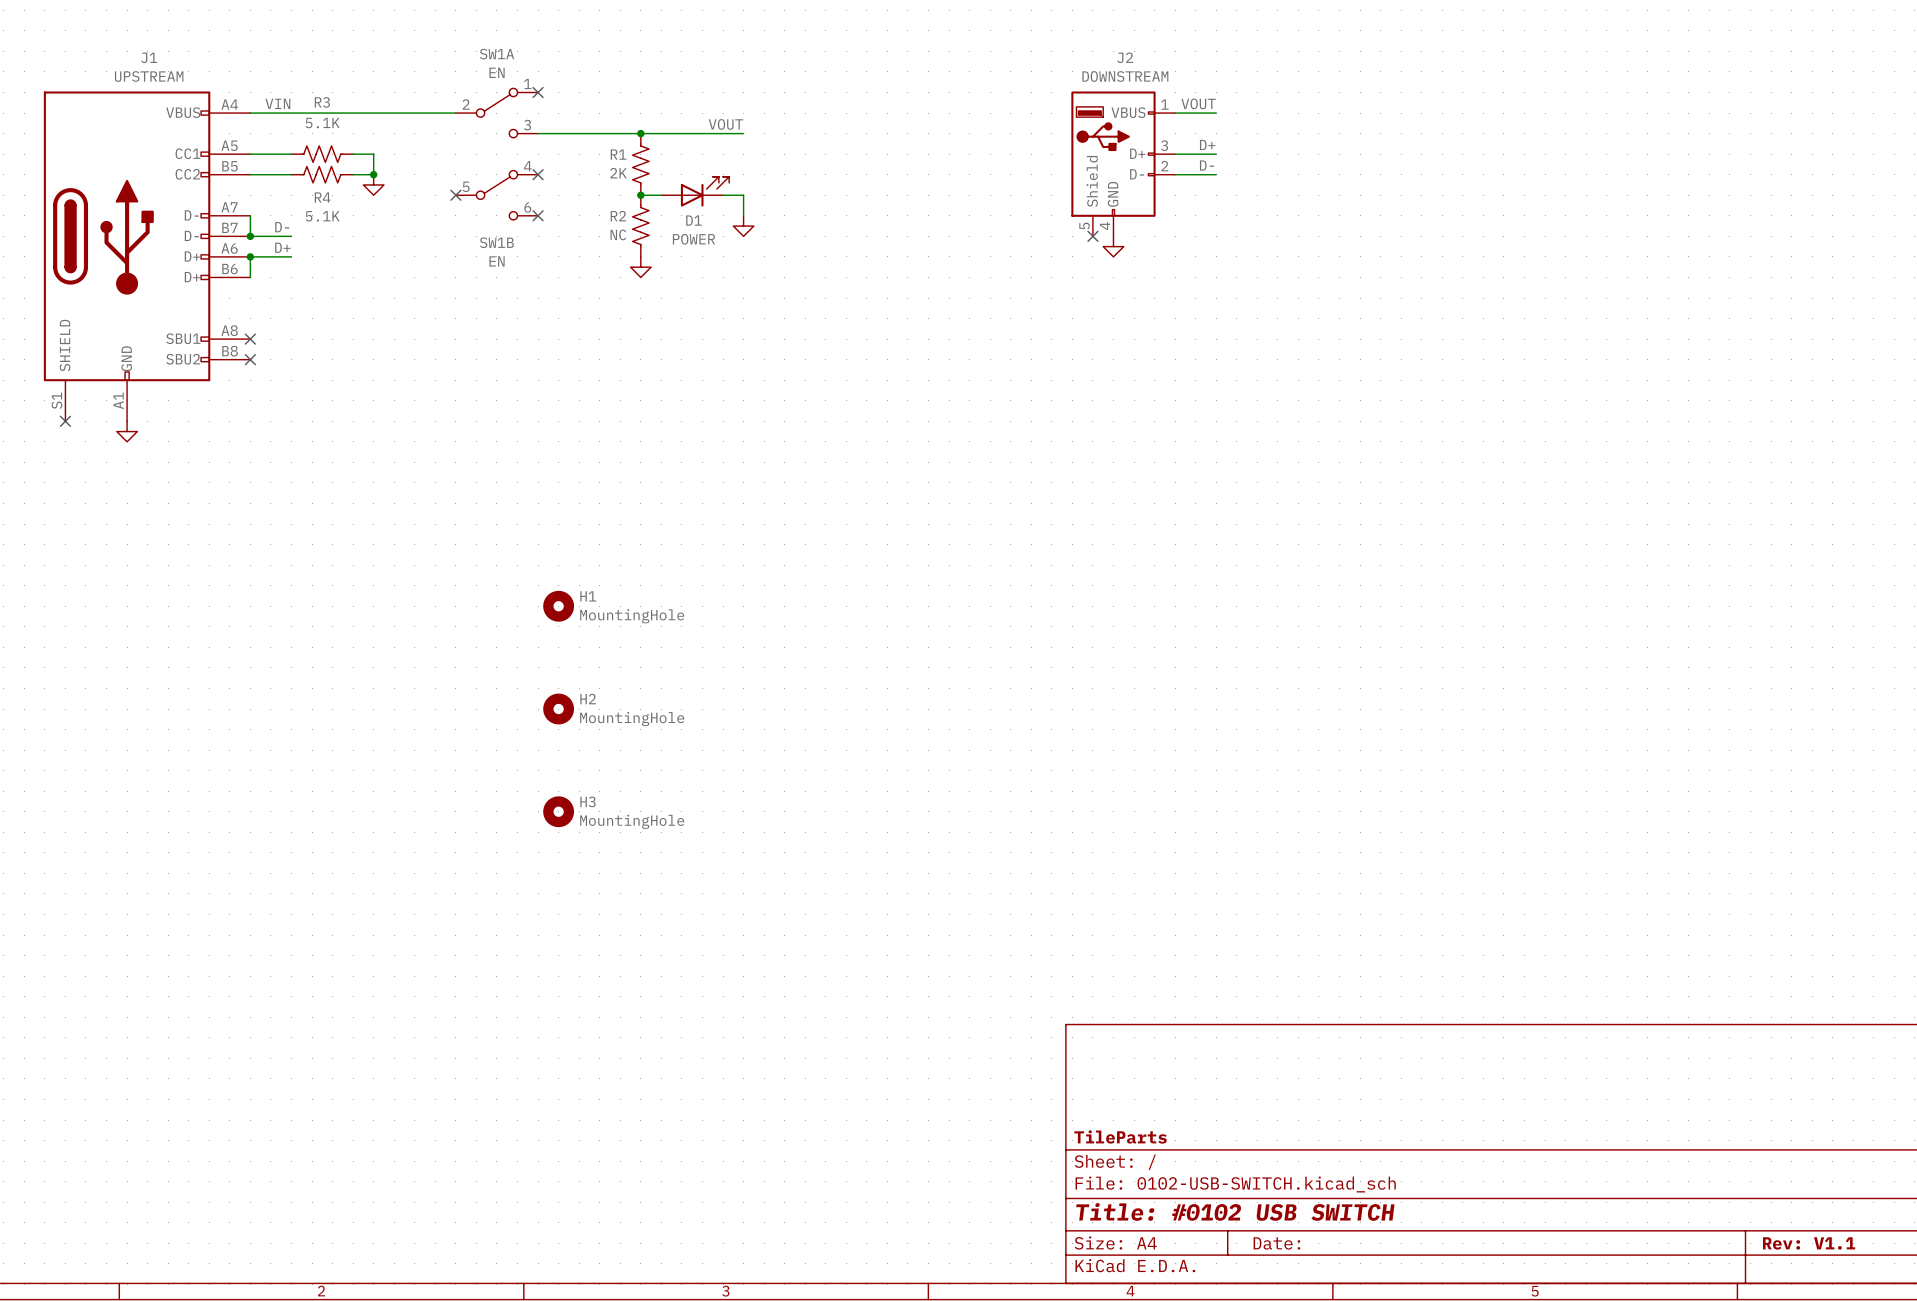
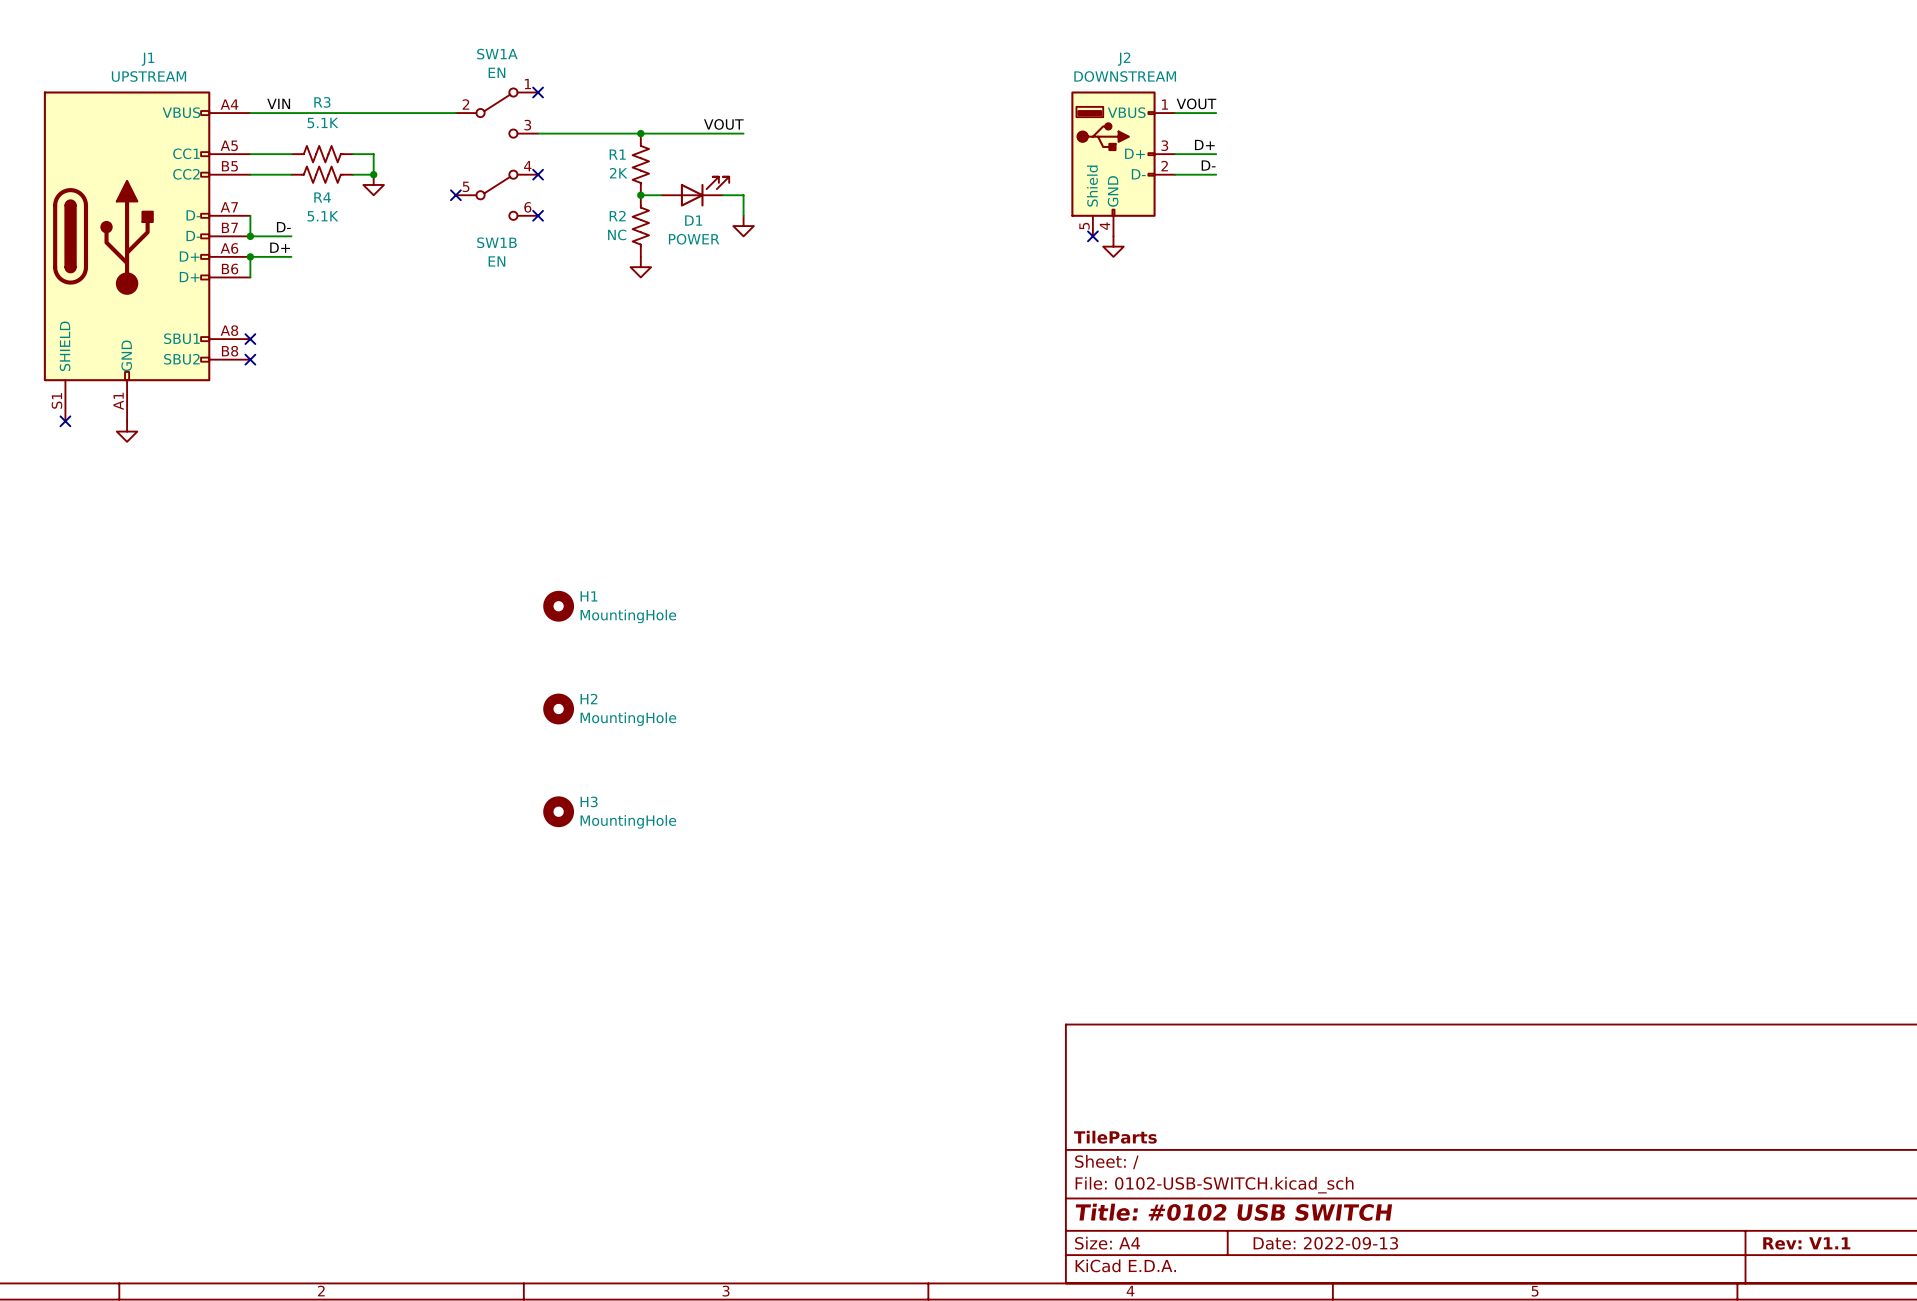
title block: Date: (1276, 1243) -> Date: 2022-09-13 (1325, 1243)

